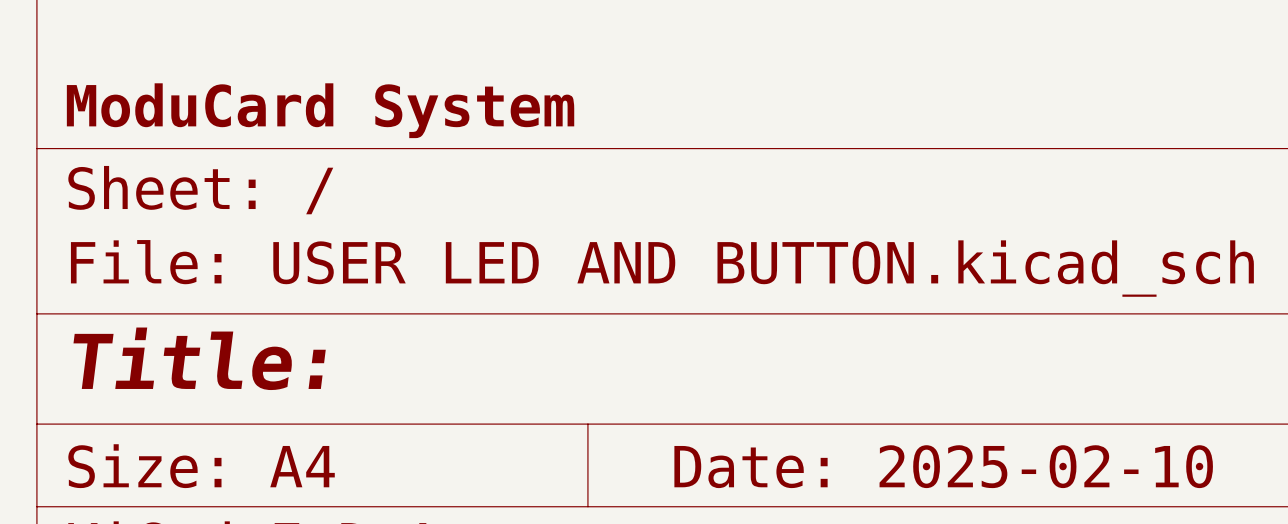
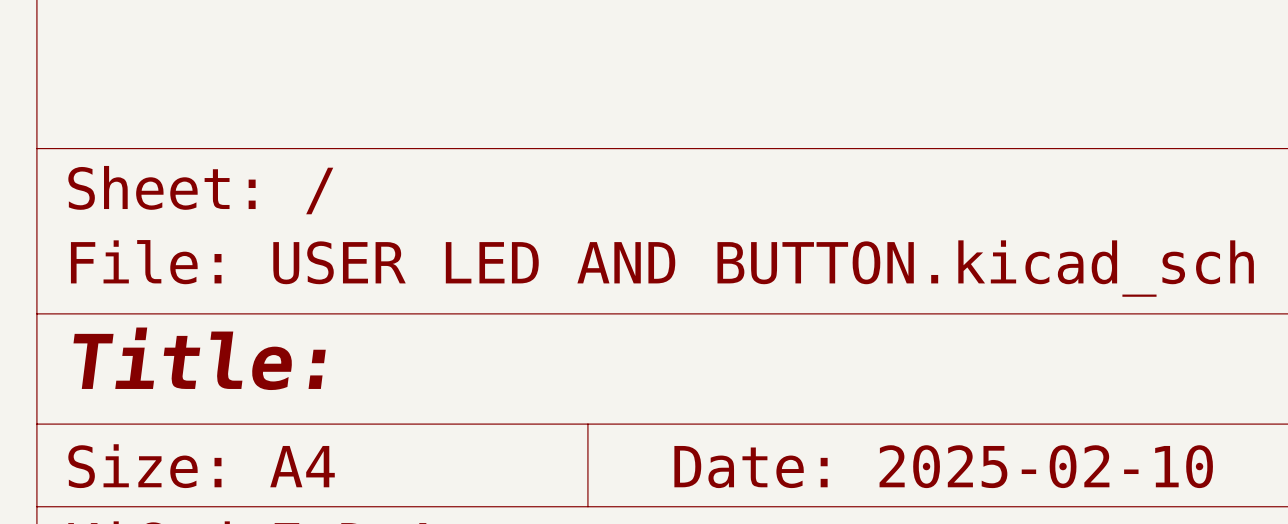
title block: ModuCard System (320, 110) -> none

